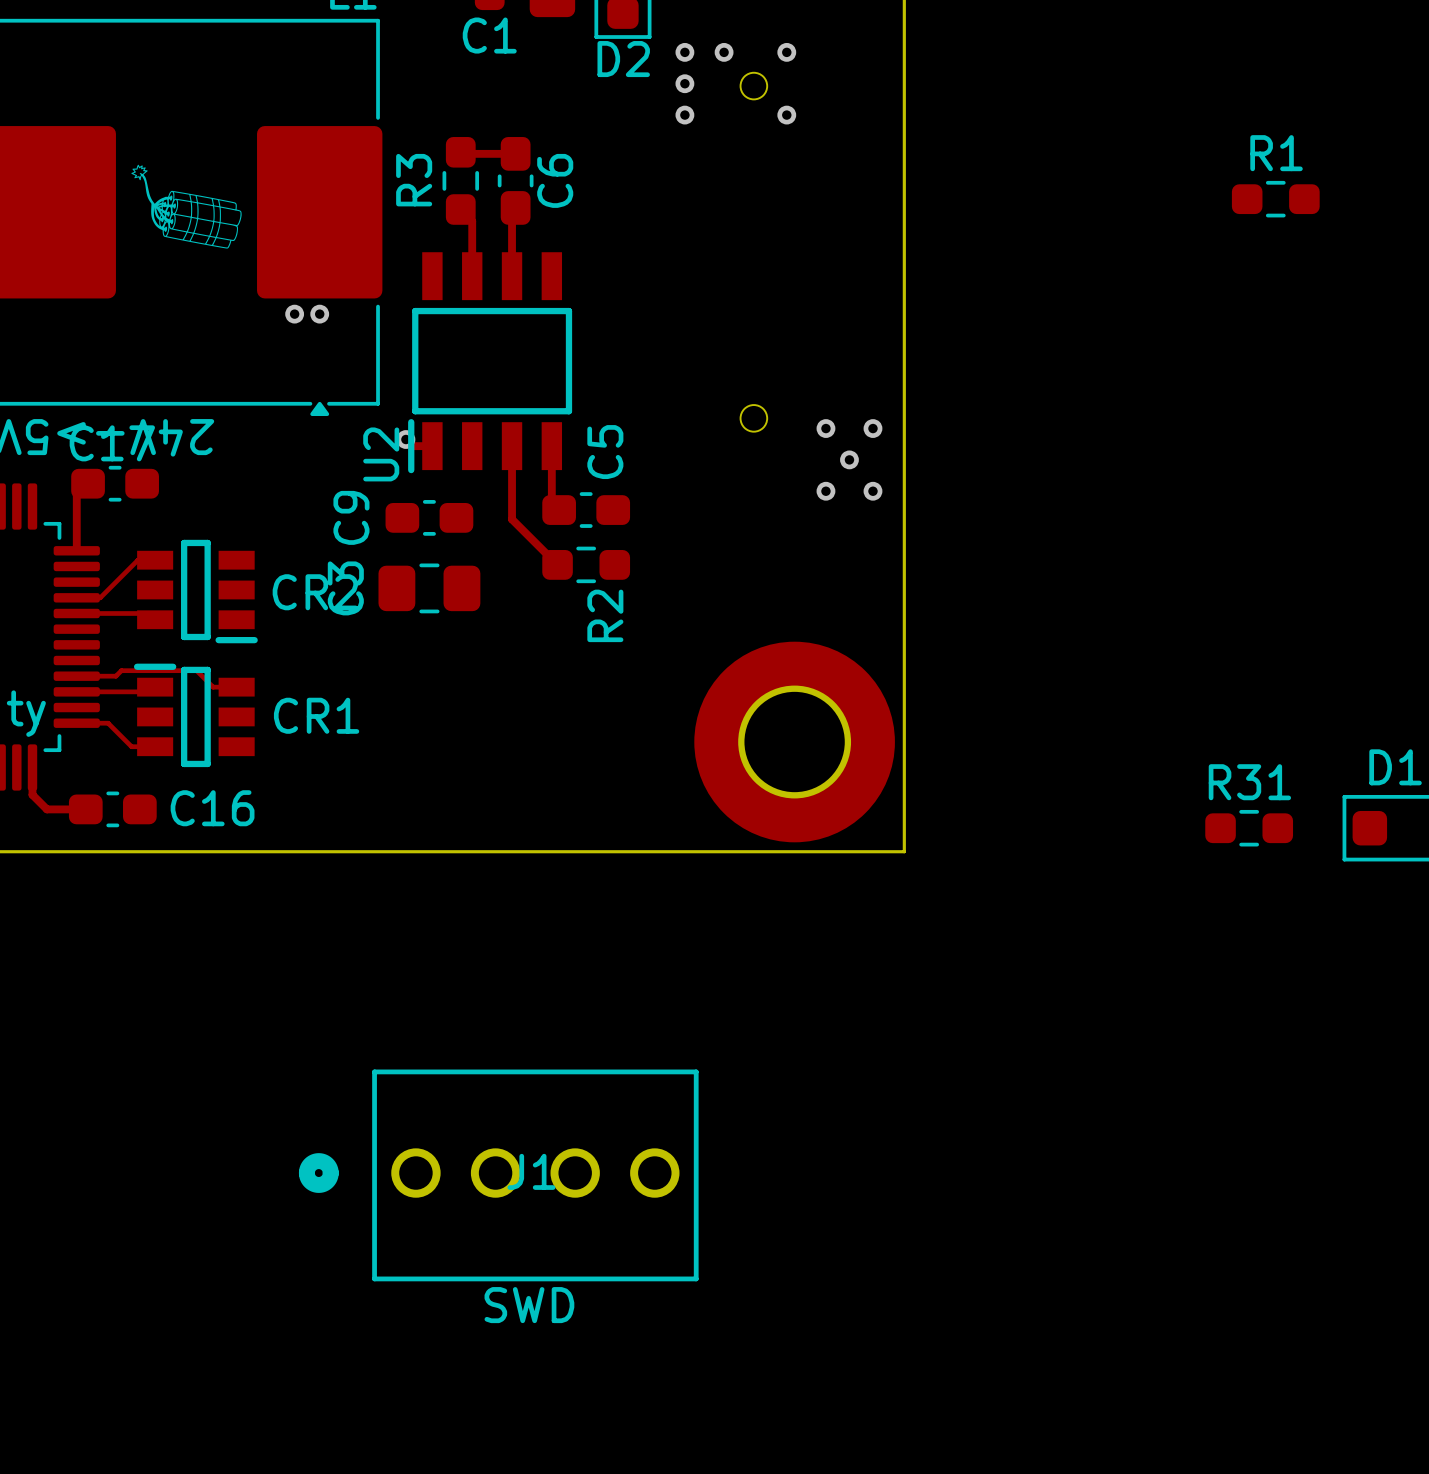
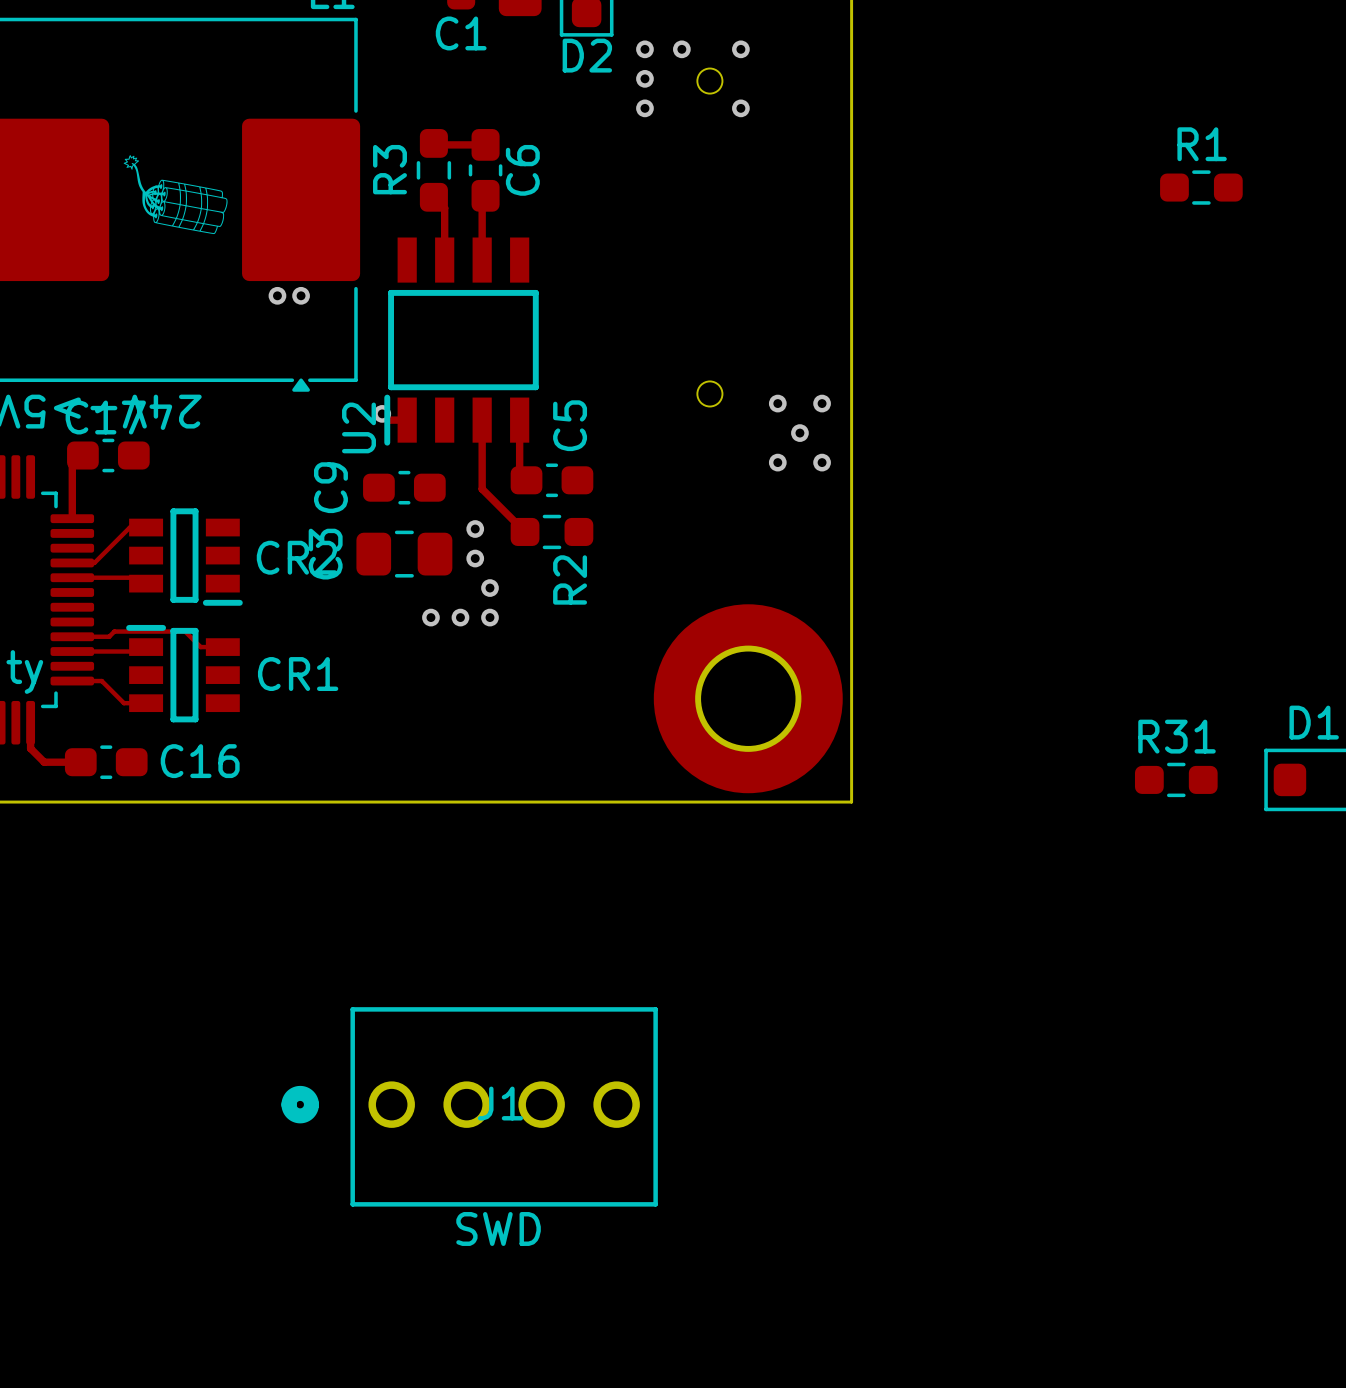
via: none -> (475, 529)
via: none -> (475, 558)
via: none -> (489, 588)
via: none -> (430, 617)
via: none -> (460, 617)
via: none -> (489, 617)

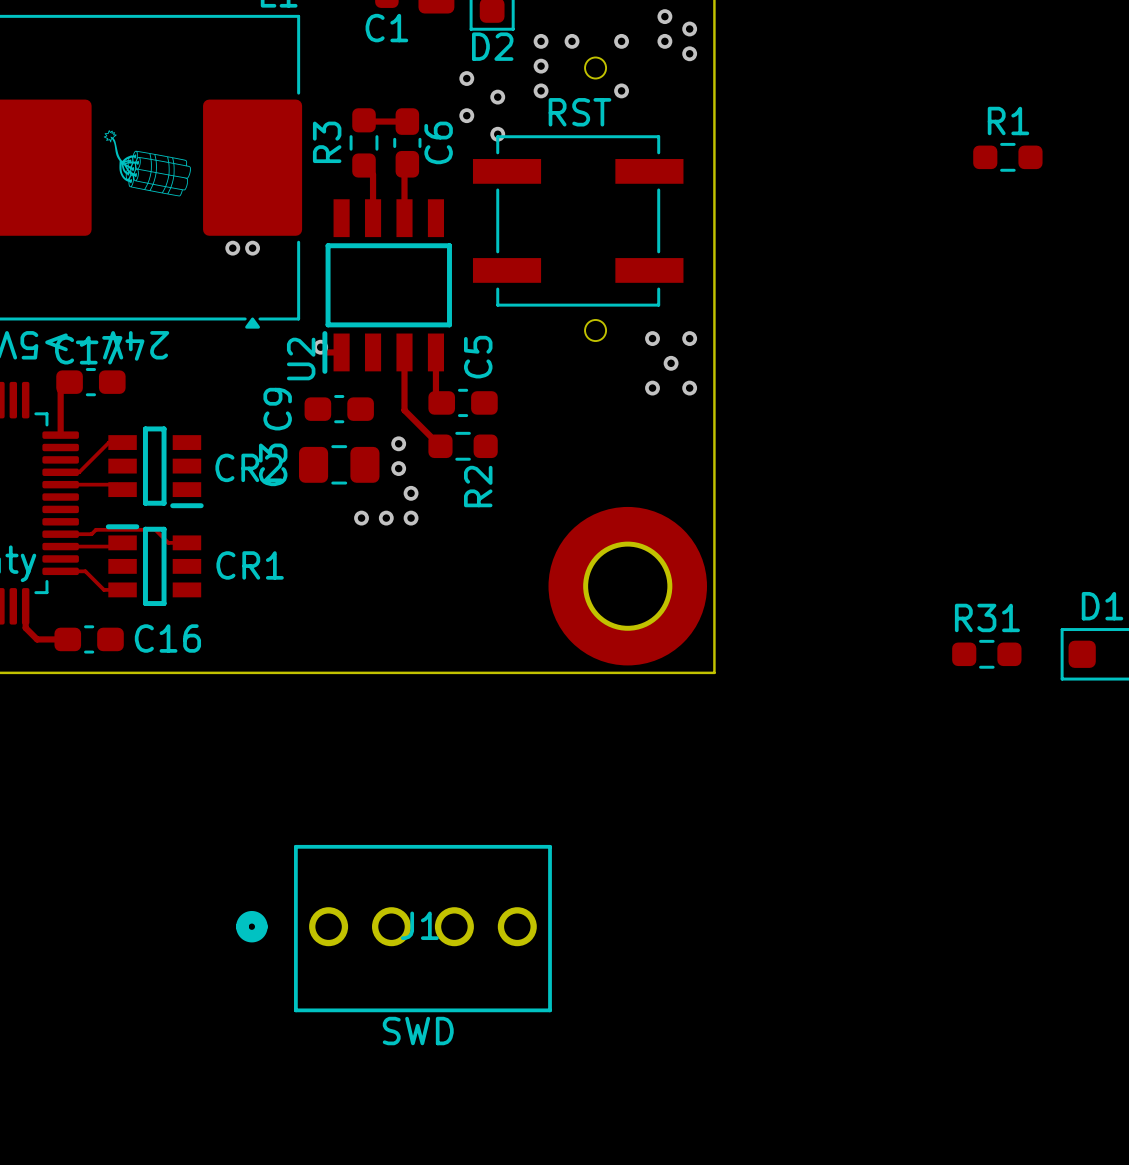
via: none -> (664, 16)
via: none -> (689, 29)
via: none -> (664, 41)
via: none -> (689, 53)
via: none -> (466, 78)
via: none -> (497, 97)
via: none -> (466, 115)
via: none -> (497, 134)
part: none -> RST (578, 220)

